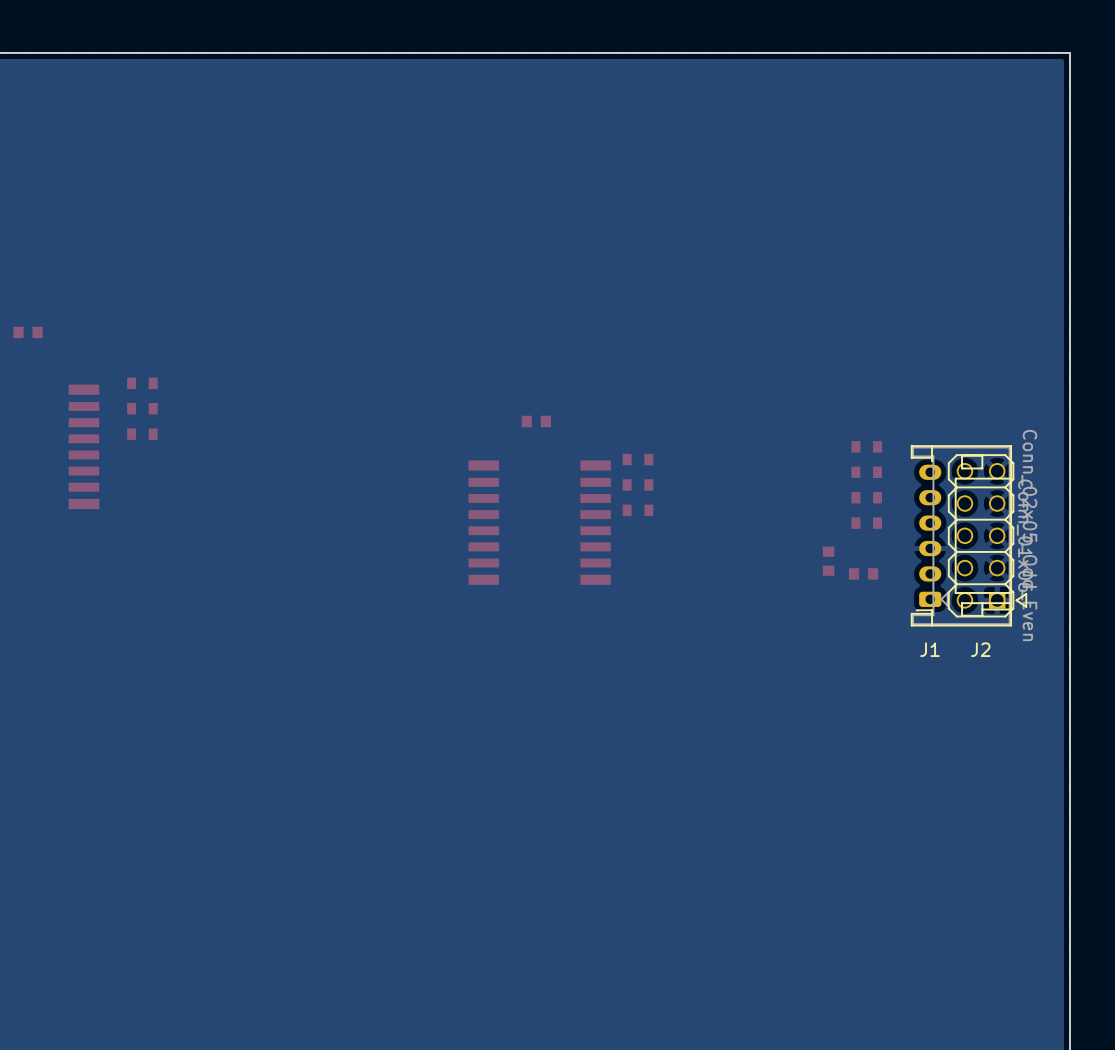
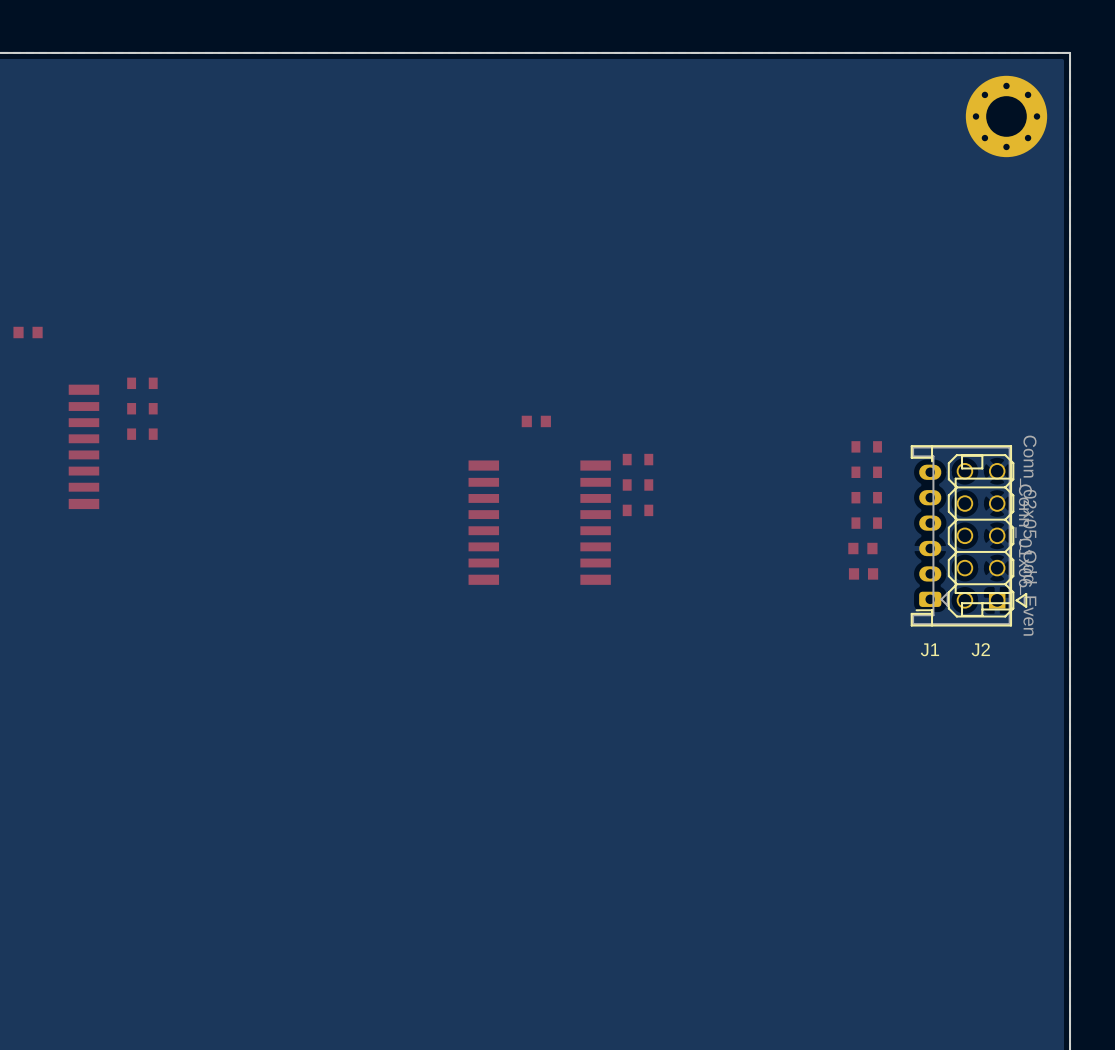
part: none -> (1006, 116)
part rotation: 0° (828, 561) -> 90° clockwise (862, 548)
part position: (828, 561) -> (862, 548)

